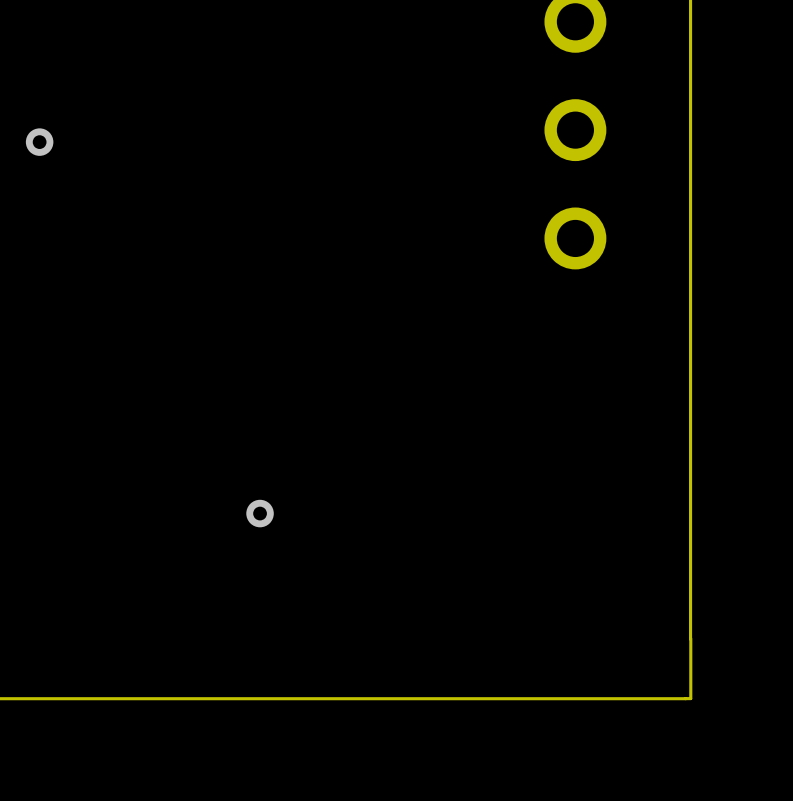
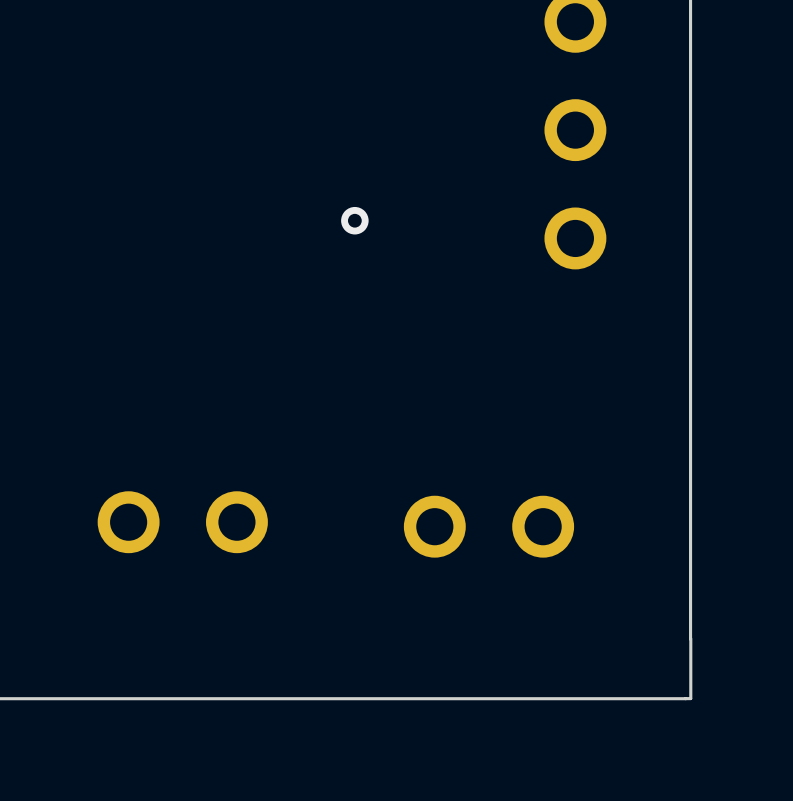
via: (39, 142) -> none
via: none -> (354, 220)
via: (260, 513) -> none
part: none -> (182, 522)
part: none -> (488, 526)

